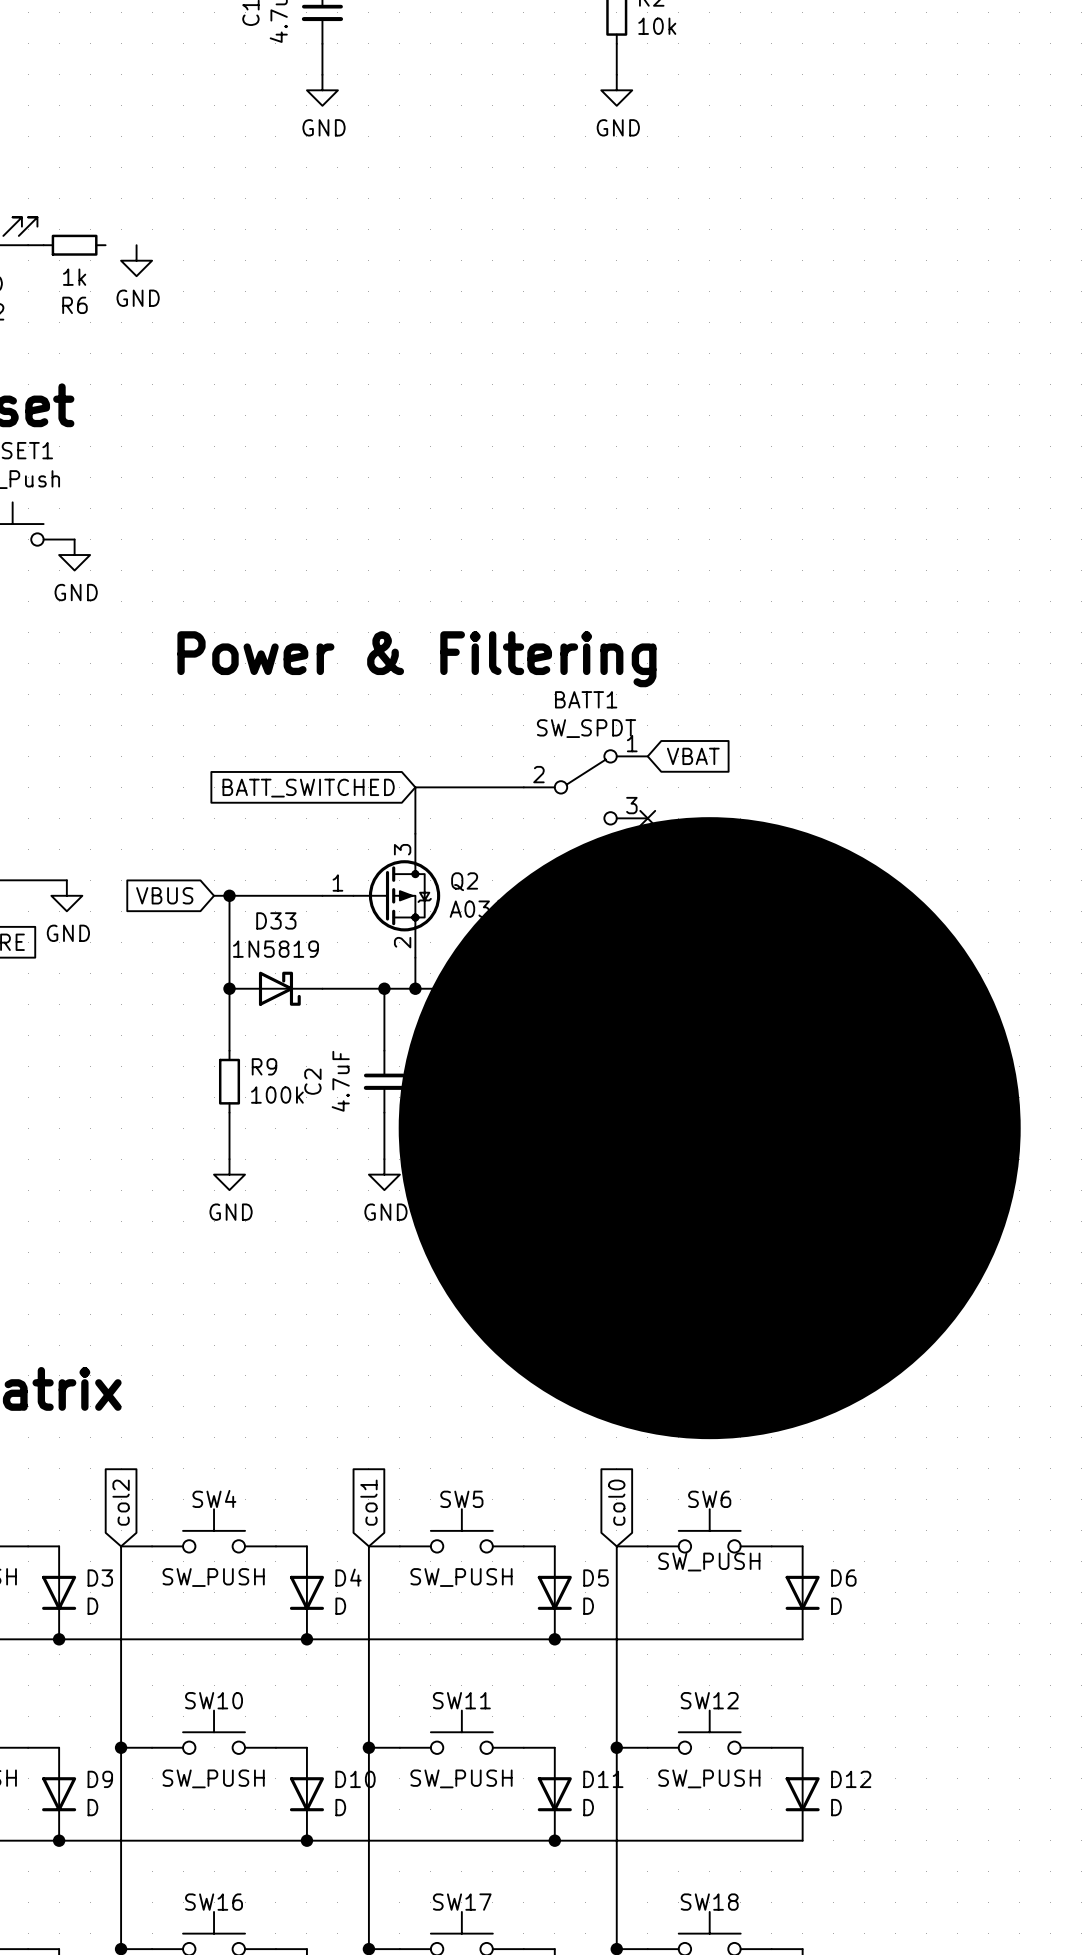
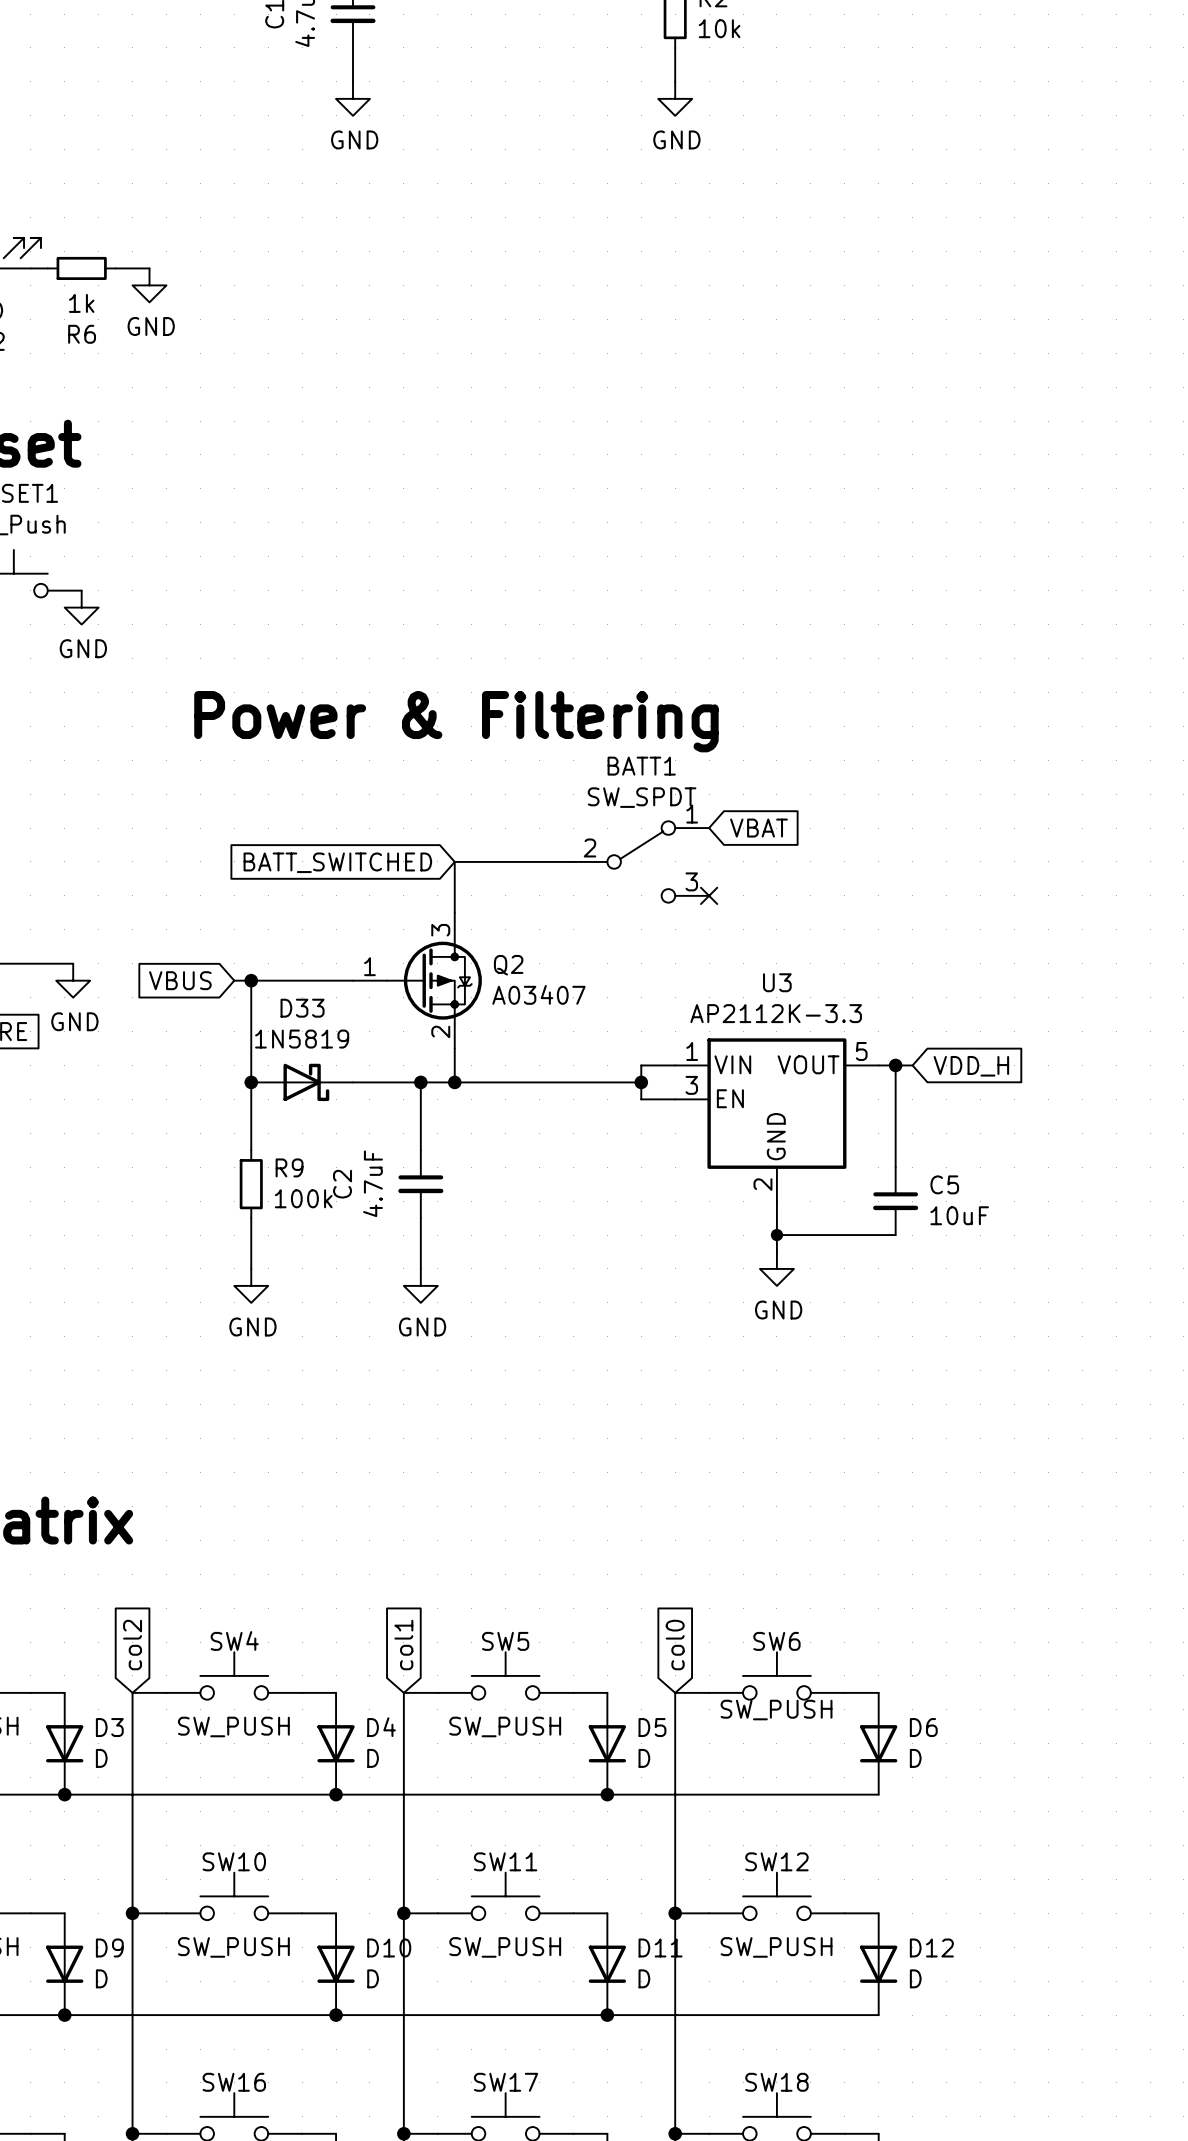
wire: none -> (115, 268) (149, 268)
junction size: [398, 817, 1021, 1440] -> [770, 1228, 784, 1242]

